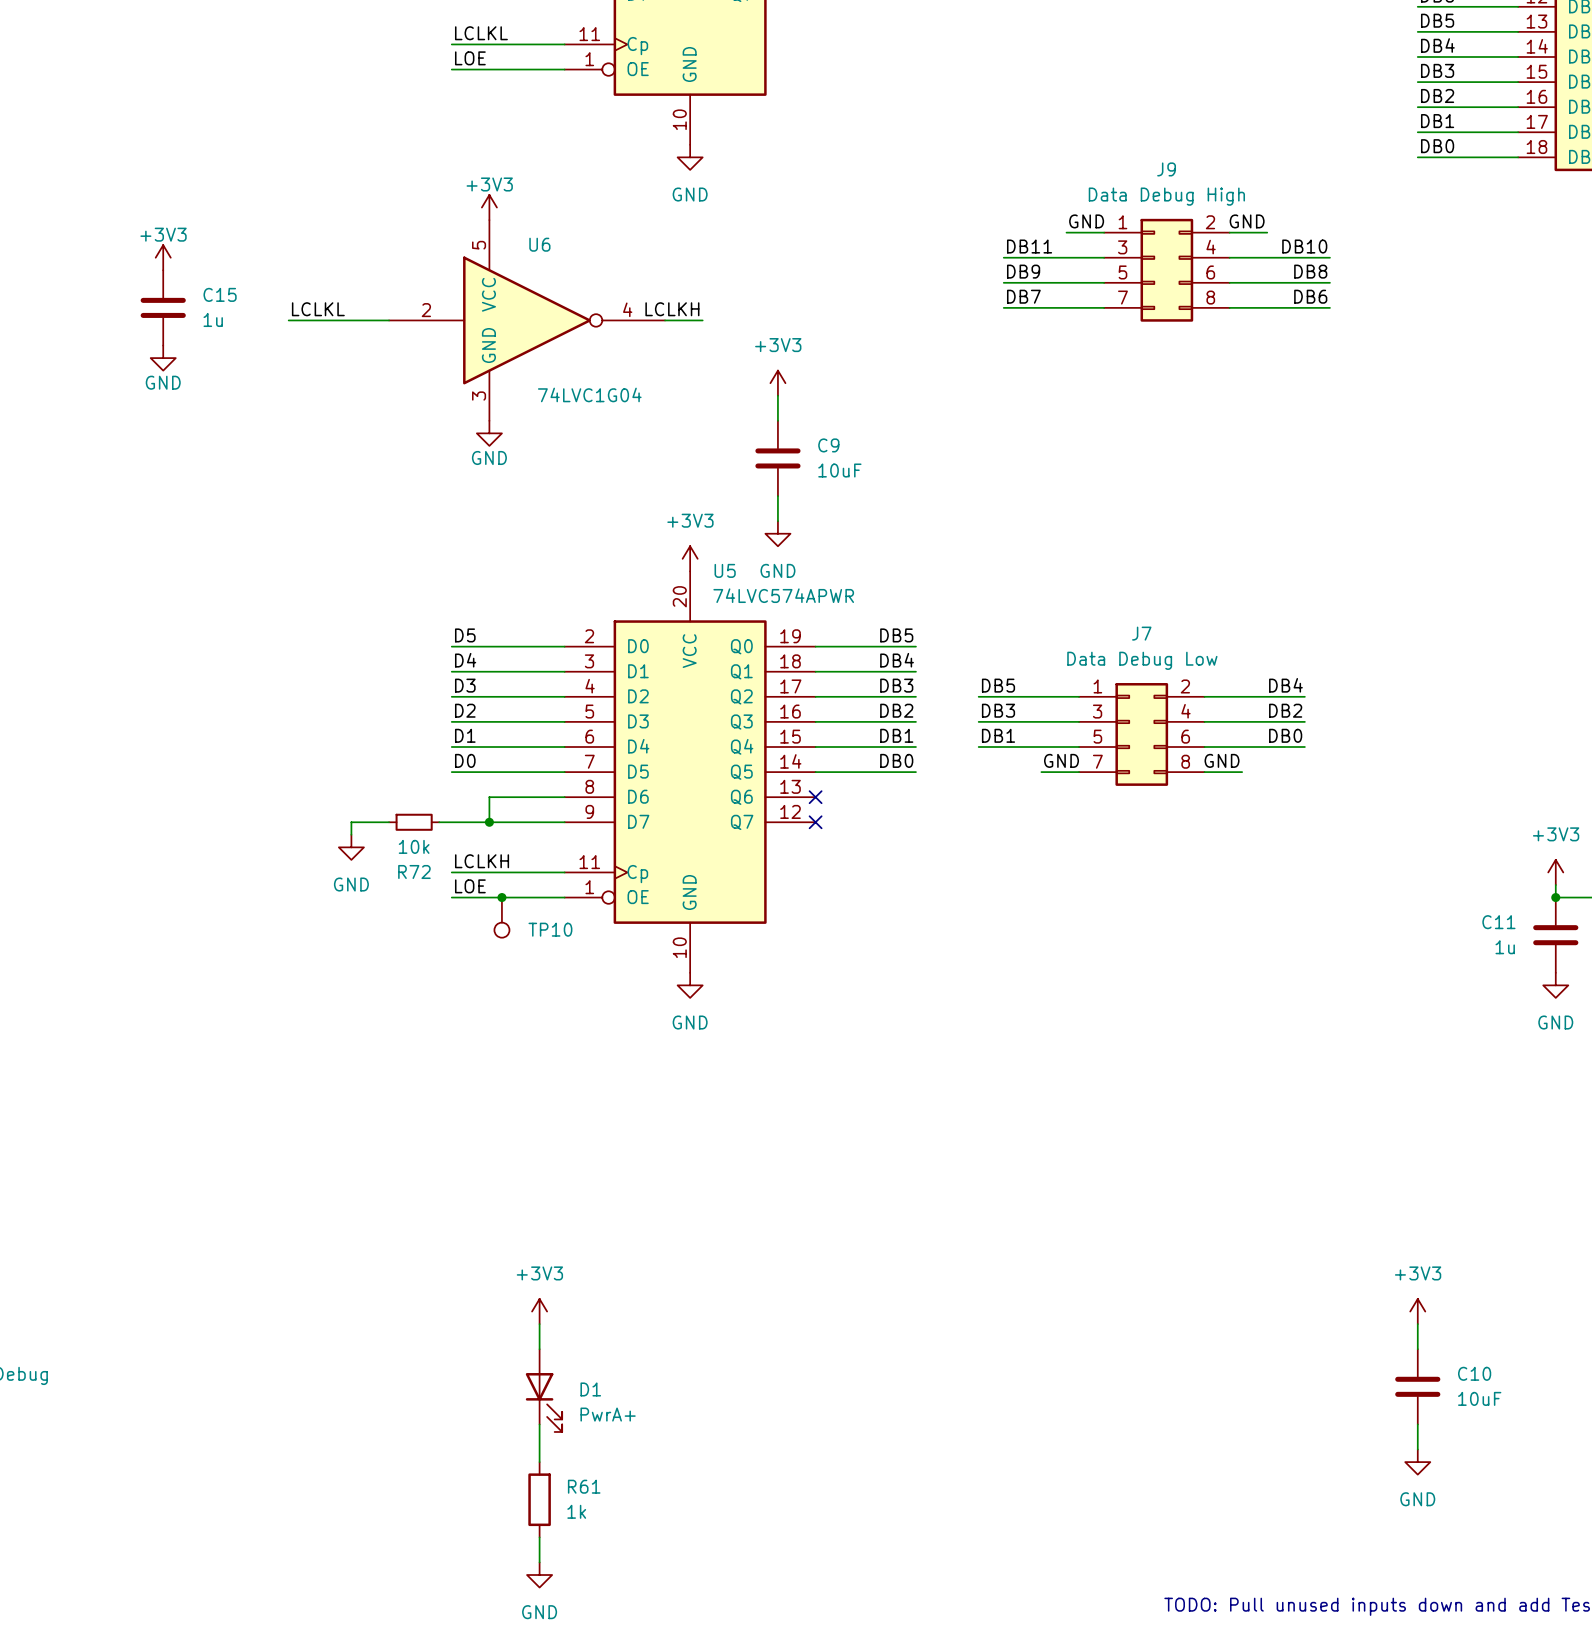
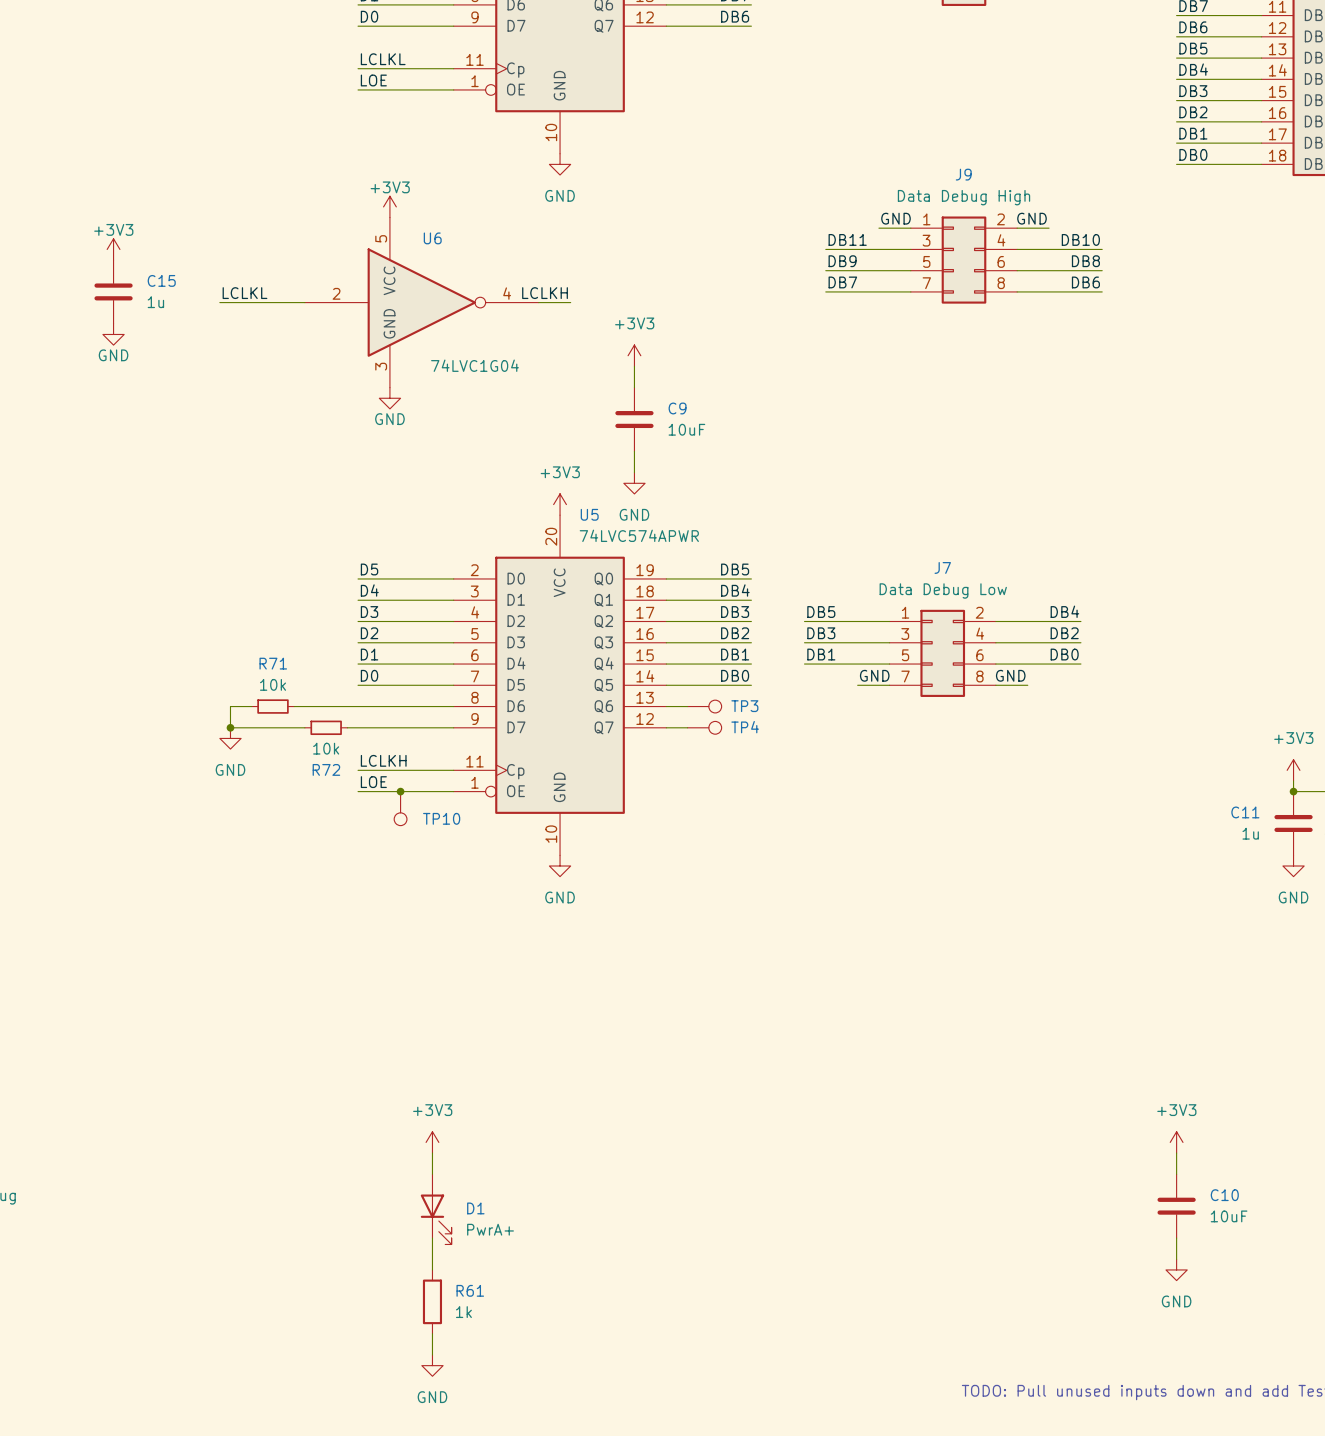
R71: none -> 10k (273, 706)
wire: (489, 797) (489, 822) -> (389, 706) (294, 706)
wire: none -> (666, 706) (687, 706)
no-connect mark: (815, 797) -> none
TP3: none -> (704, 706)
junction: none -> (230, 727)
wire: (351, 822) (351, 834) -> (273, 727) (230, 727) (230, 706) (251, 706)
junction: (489, 822) -> none
wire: none -> (666, 727) (687, 727)
no-connect mark: (815, 822) -> none
TP4: none -> (704, 727)
power symbol position: GND (351, 847) -> GND (230, 738)

